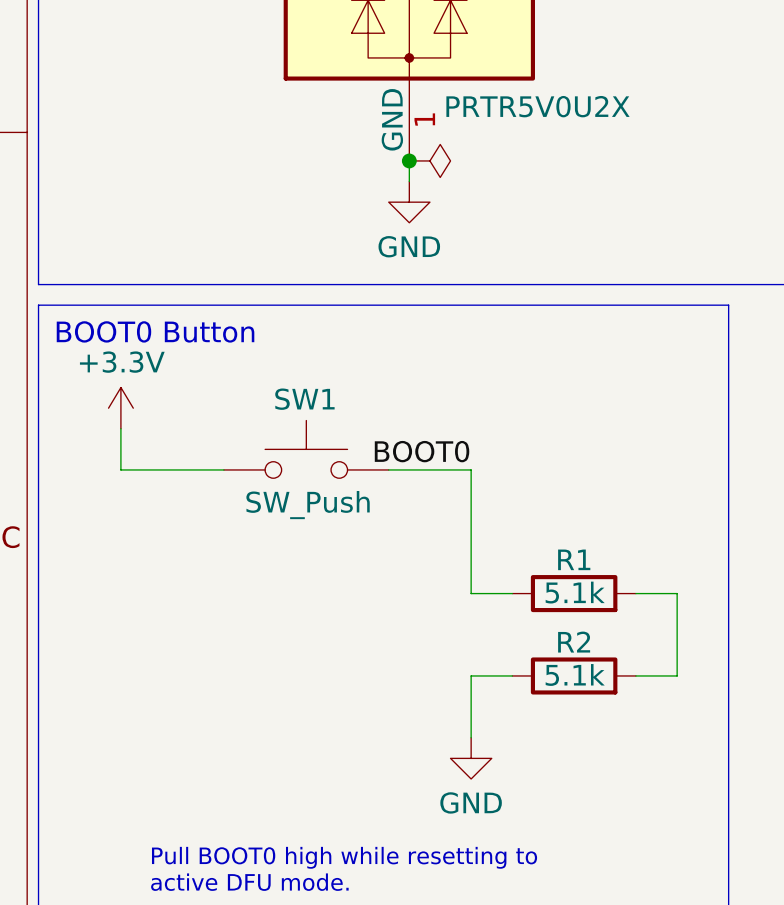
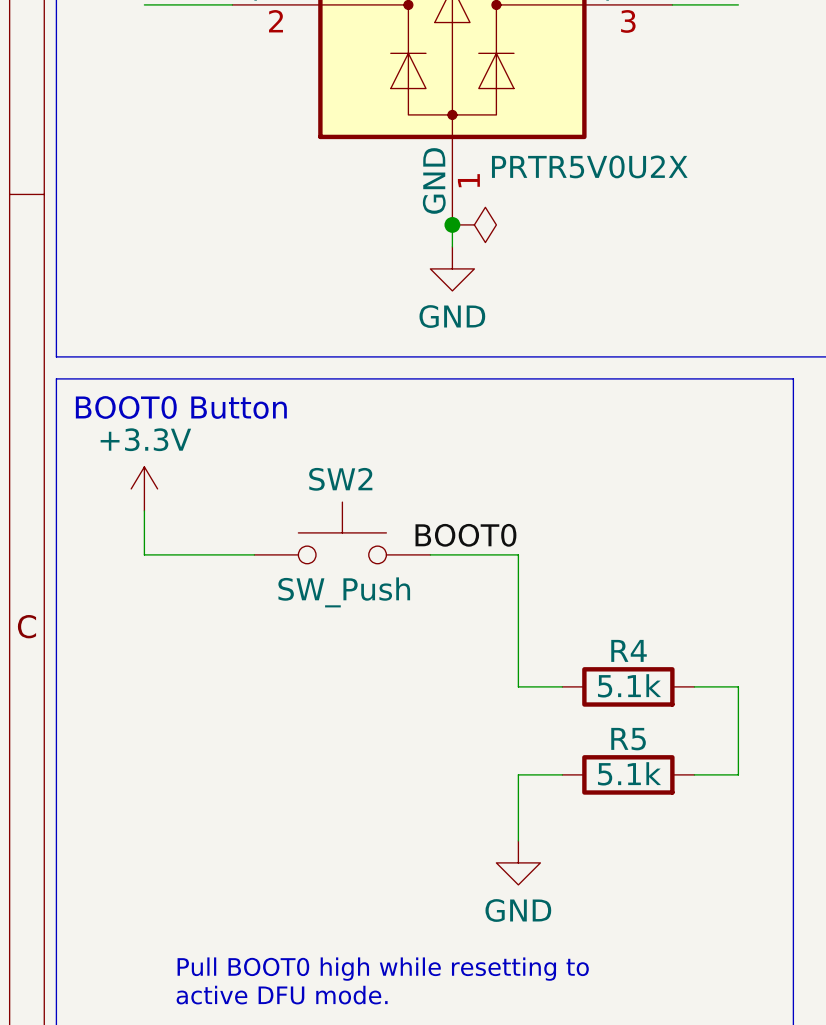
SW1 name: SW1 (304, 399) -> SW2 (340, 479)
R1 name: R1 (574, 559) -> R4 (629, 650)
R2 name: R2 (574, 642) -> R5 (628, 739)

